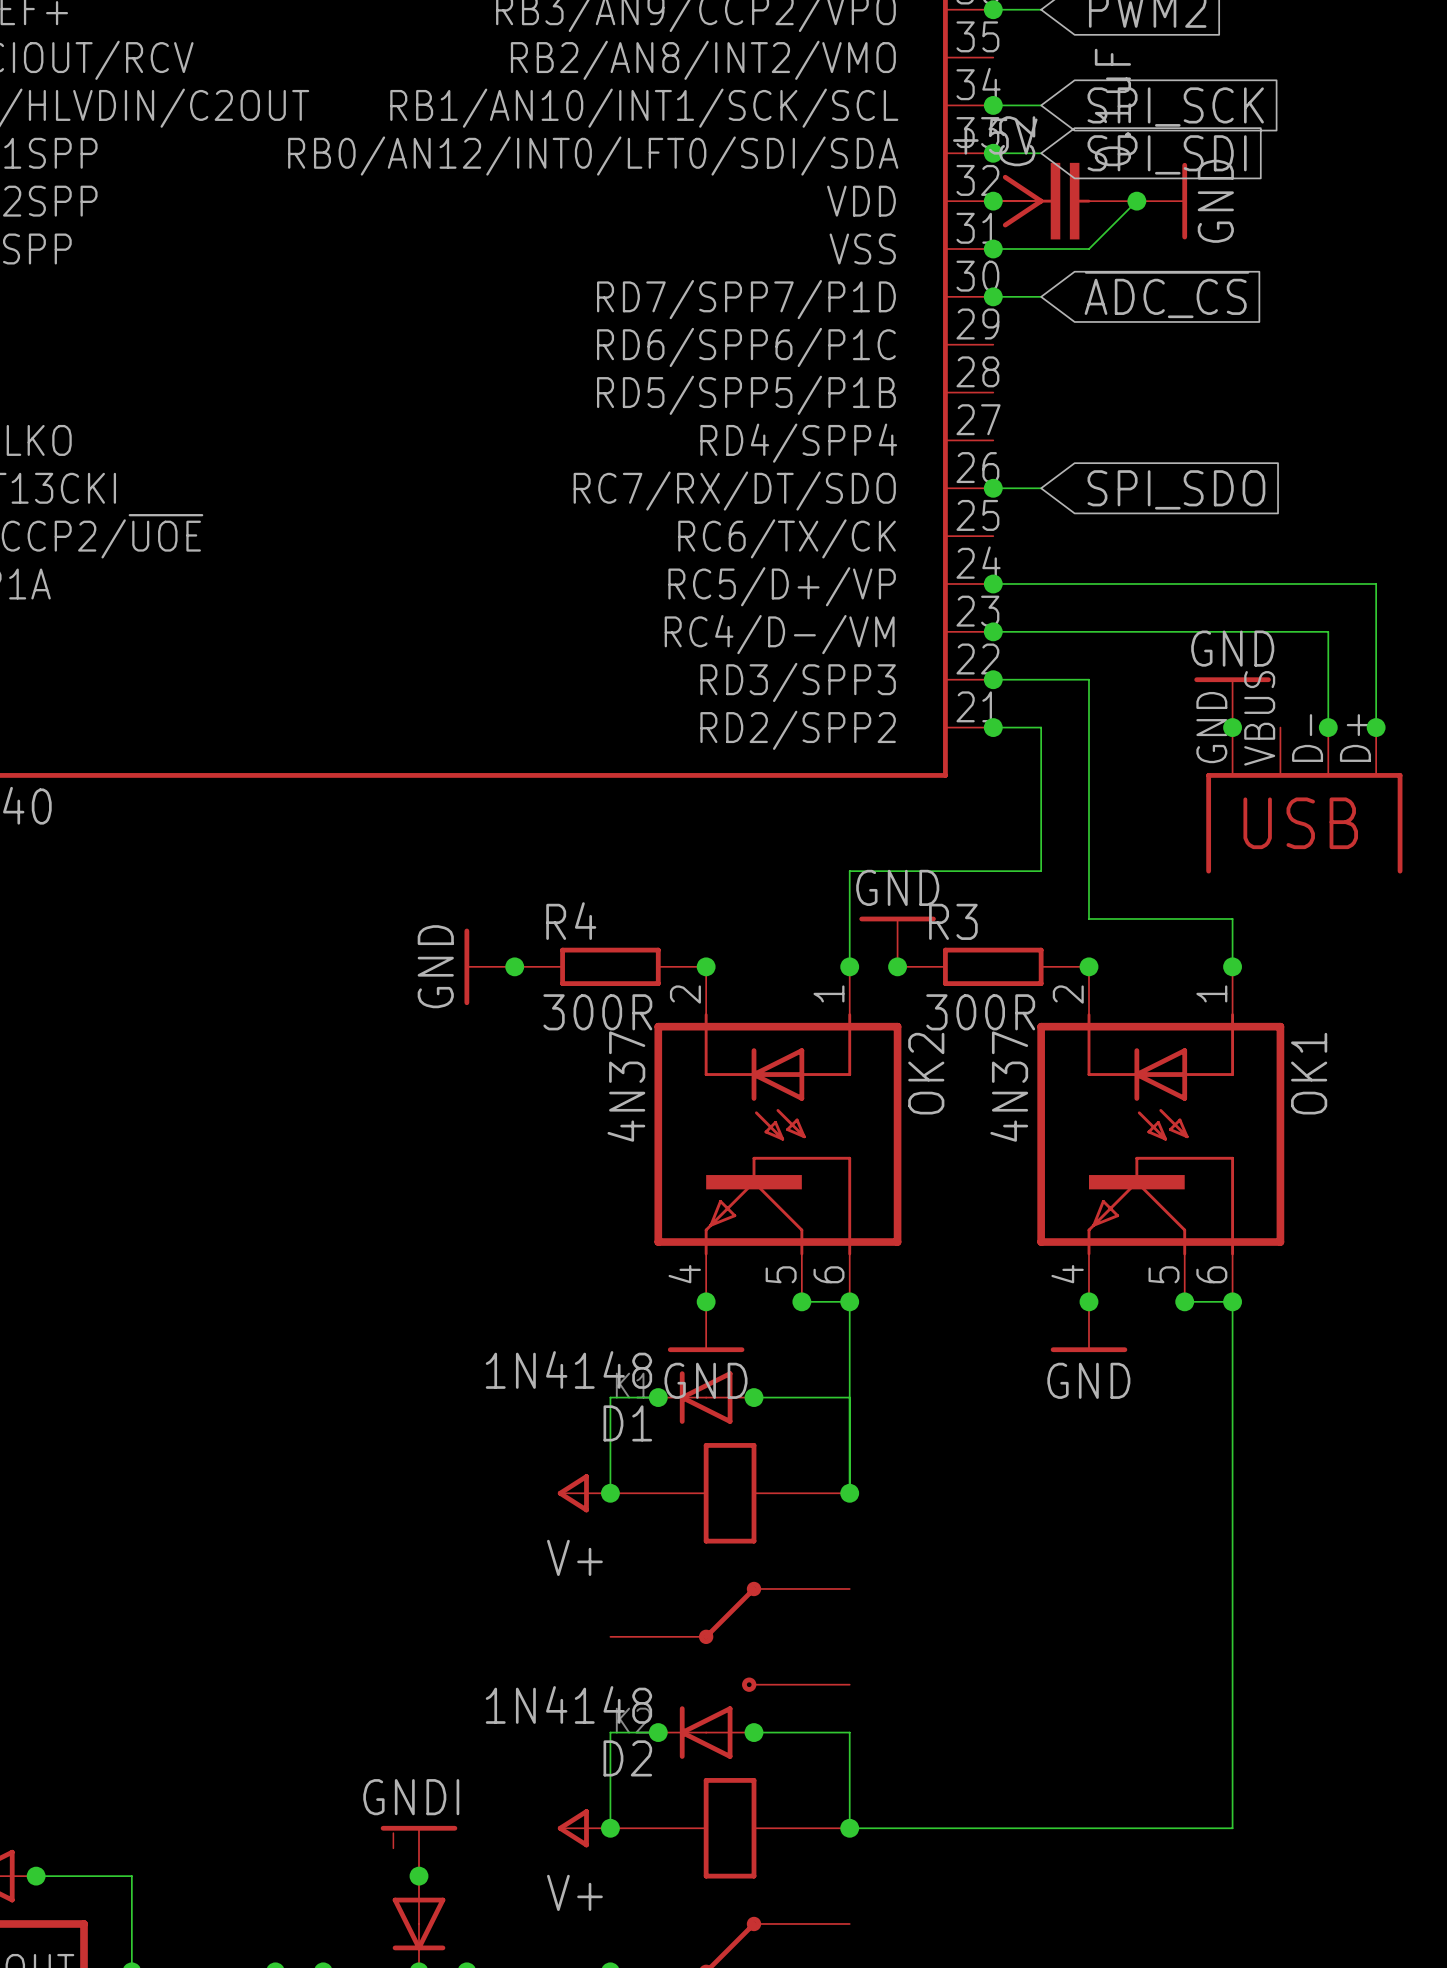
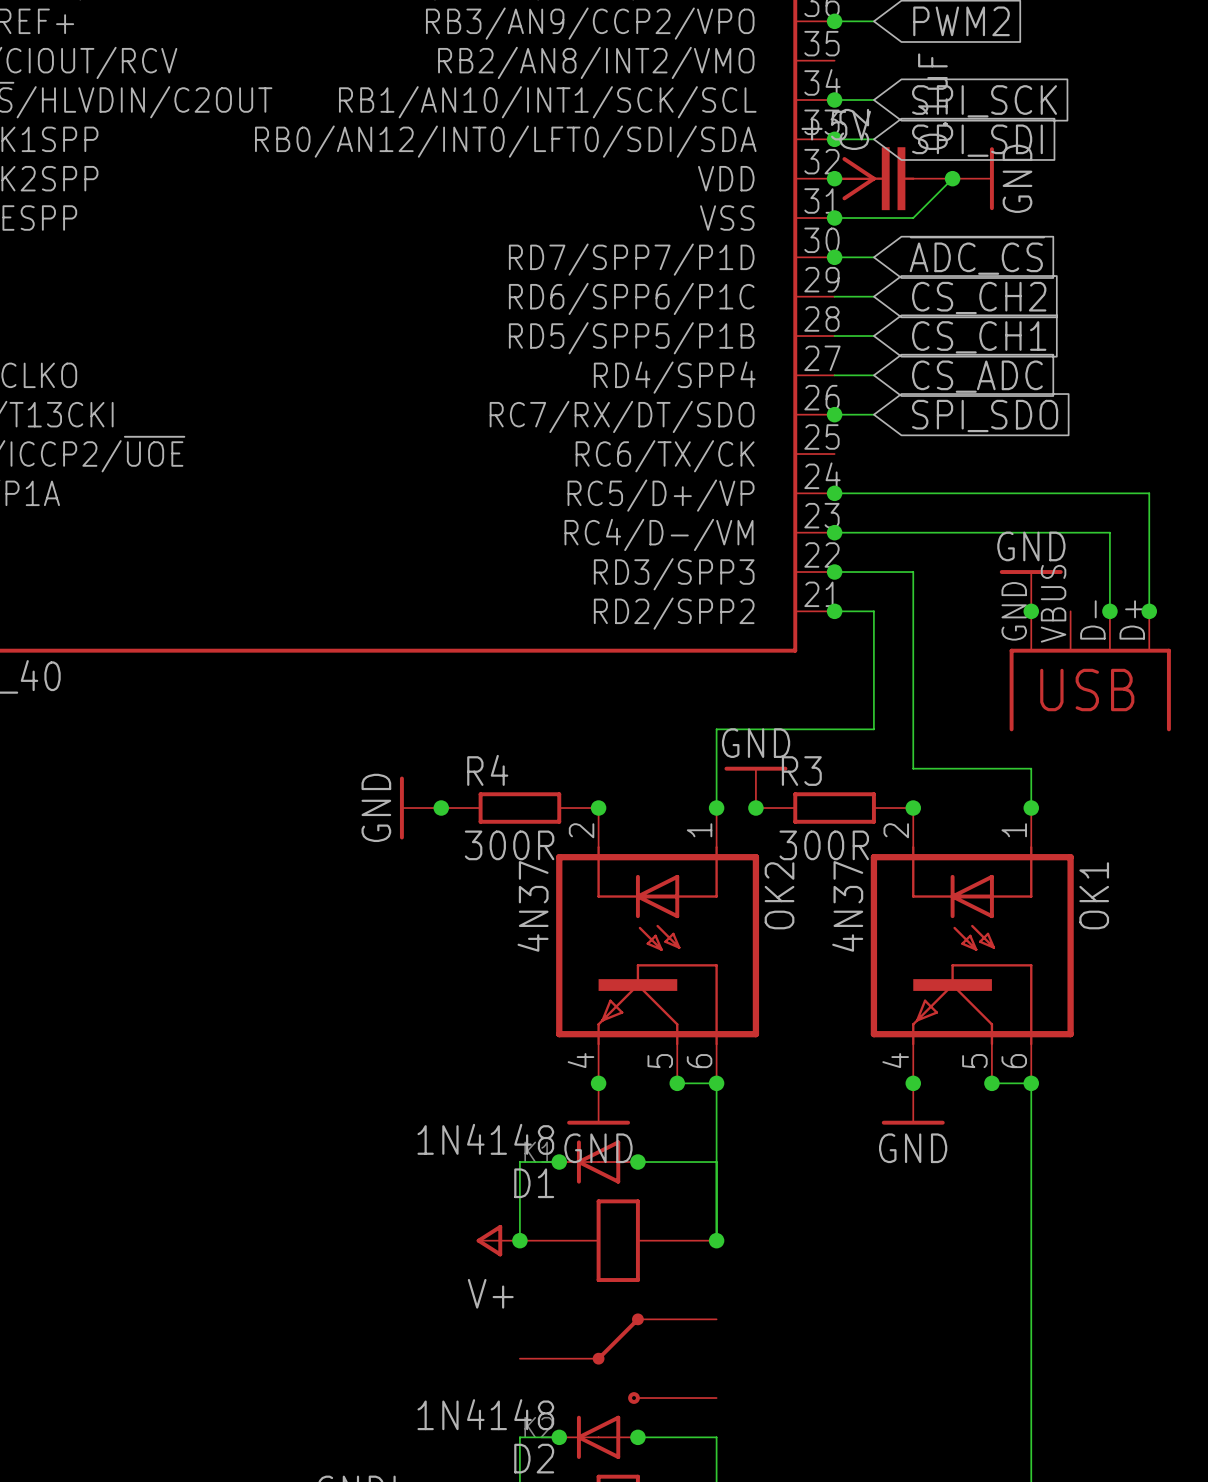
wire: none -> (834, 296) (873, 296)
global label: none -> CS_CH2 (979, 297)
wire: none -> (834, 336) (873, 336)
global label: none -> CS_CH1 (979, 337)
wire: none -> (834, 375) (873, 375)
global label: none -> CS_ADC (977, 376)

